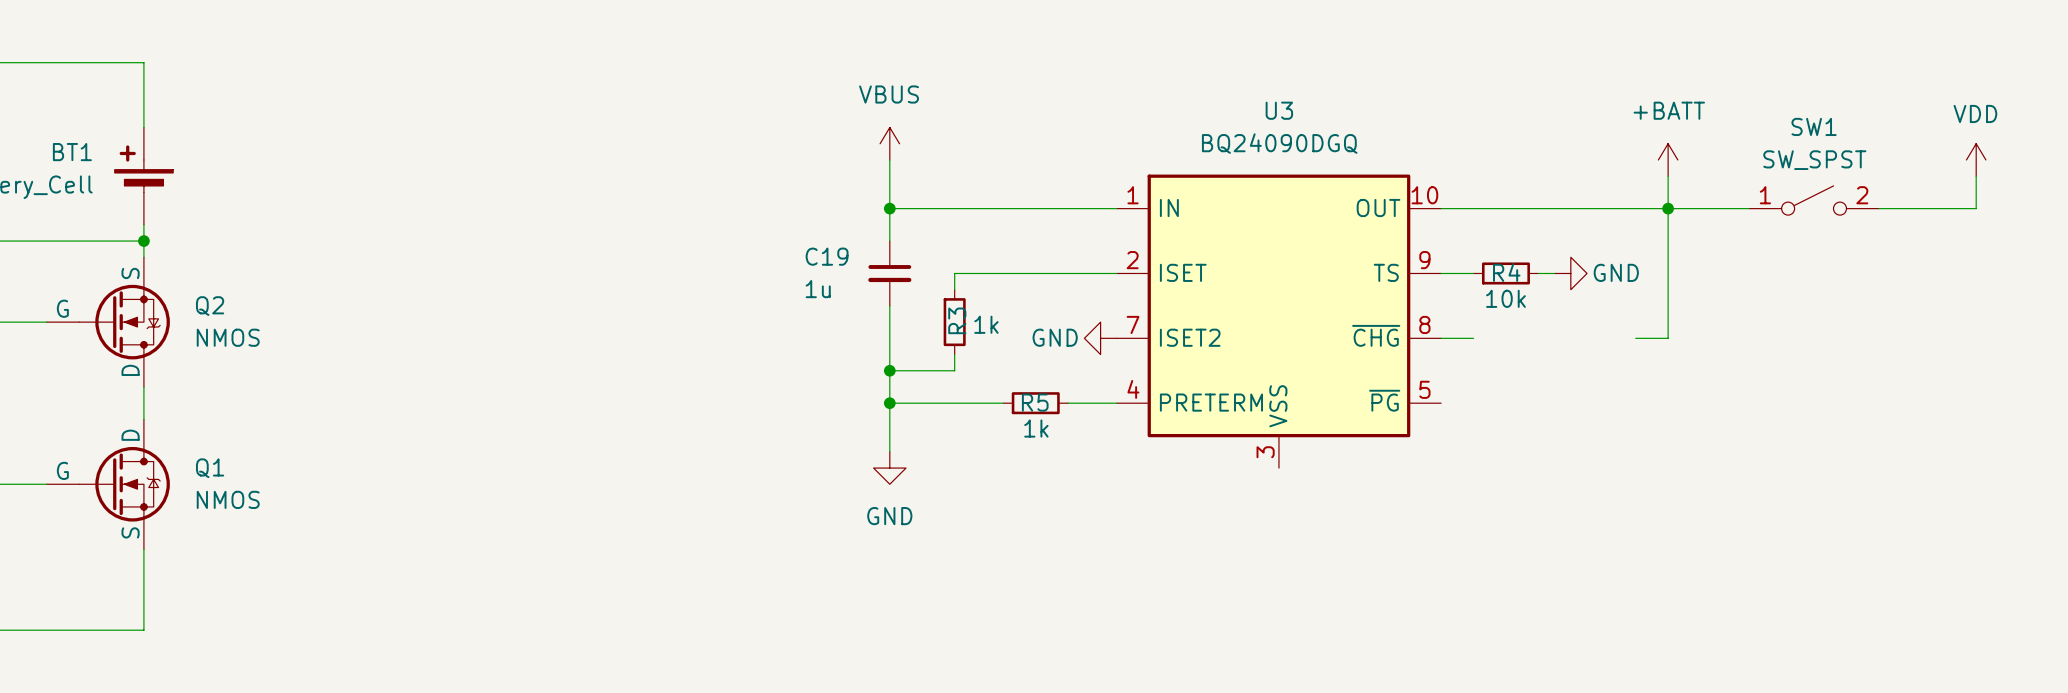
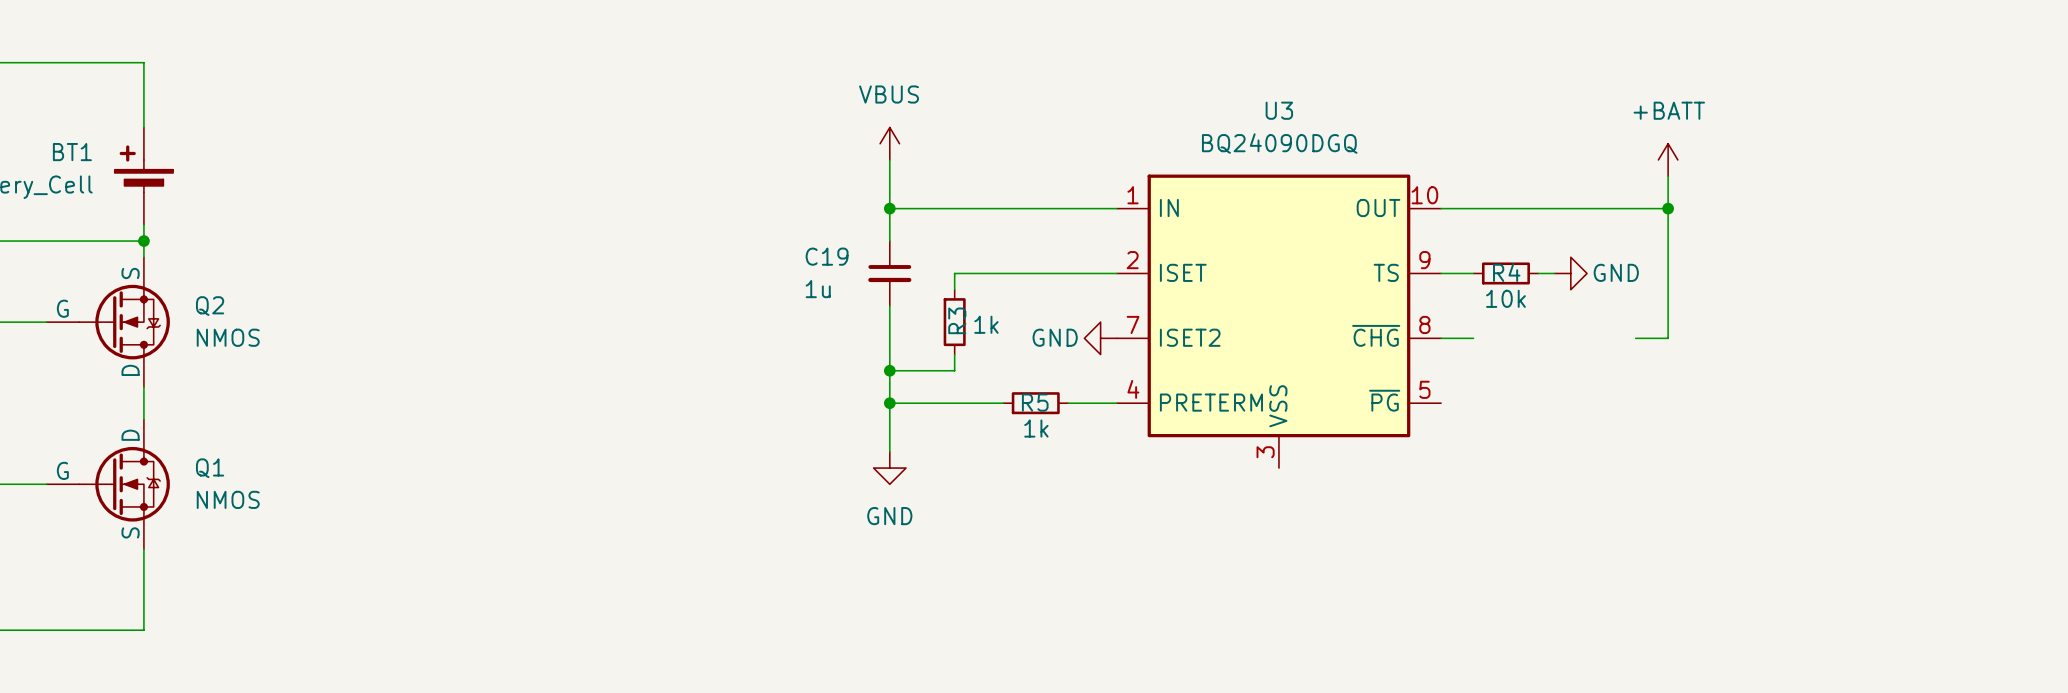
power symbol: VDD (1976, 159) -> none
wire: (1976, 176) (1976, 208) (1878, 208) -> none
SW1: SW_SPST (1814, 200) -> none
wire: (1668, 208) (1749, 208) -> none

